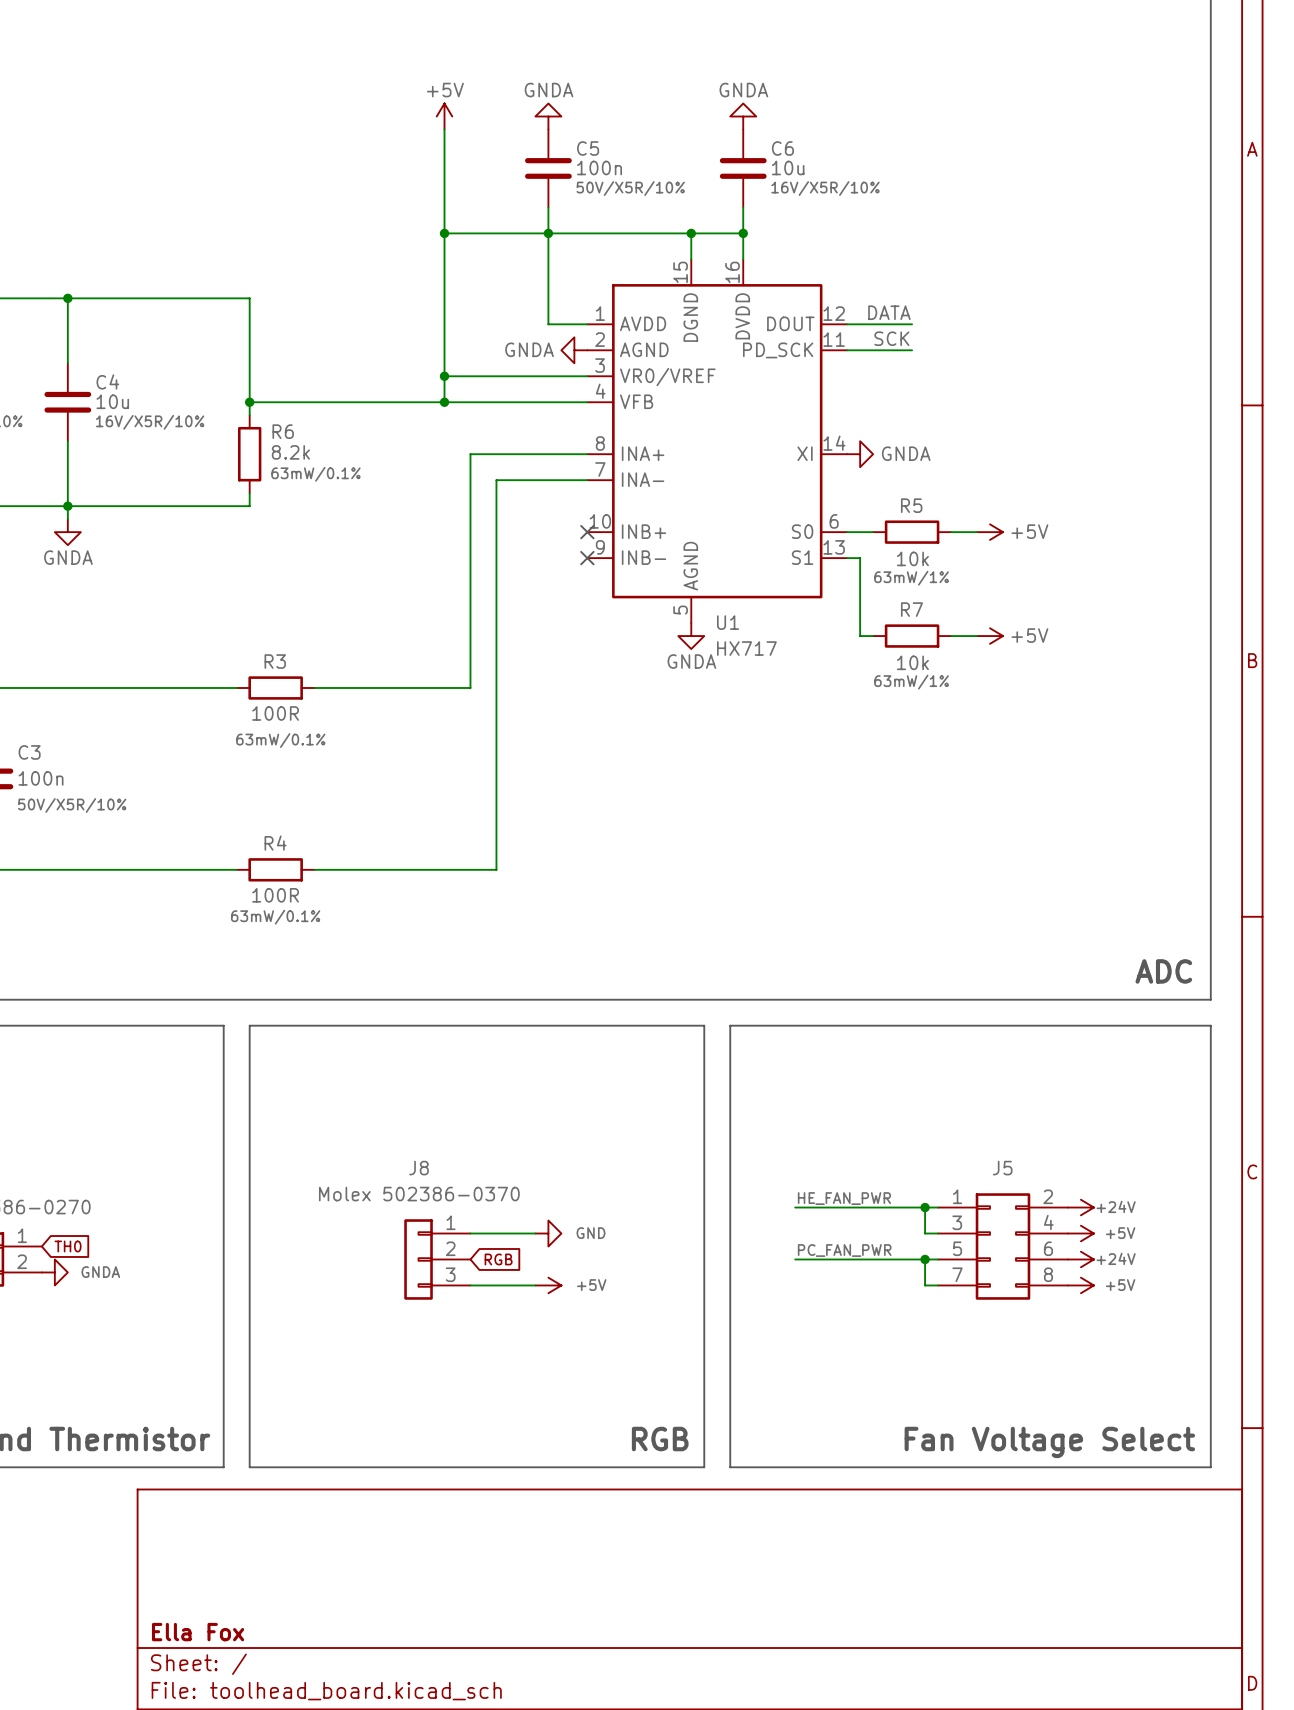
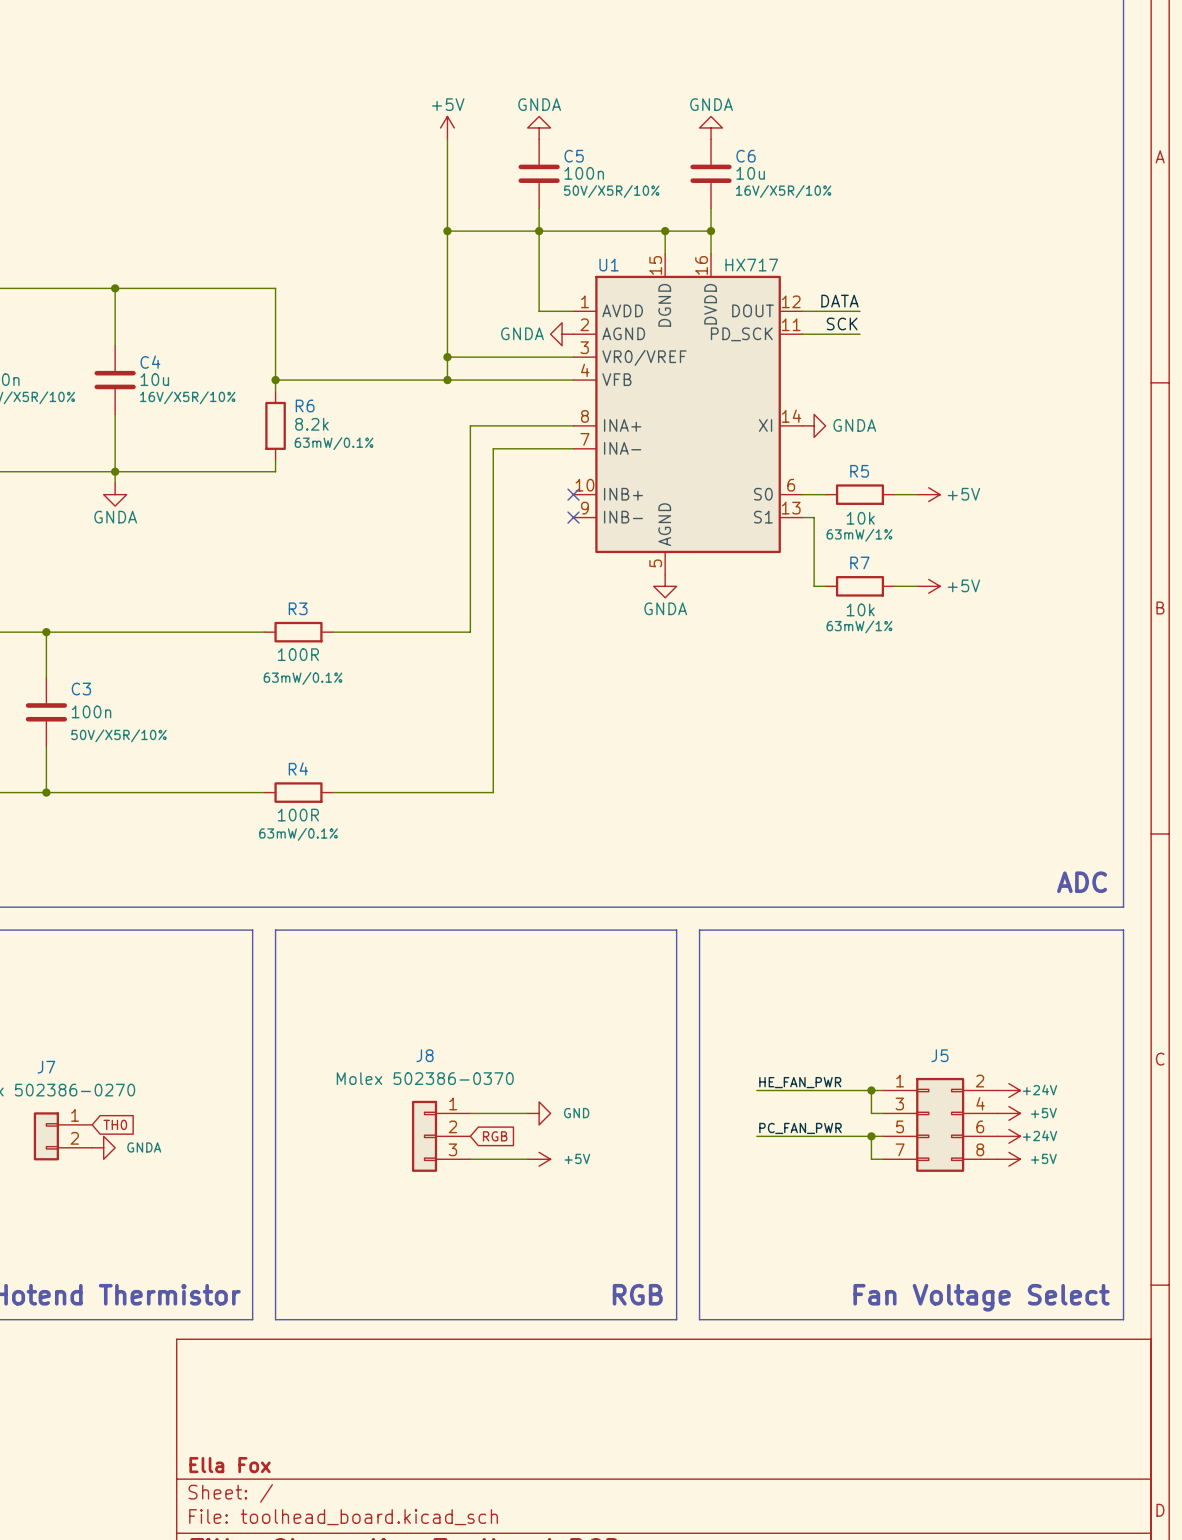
U1 name position: U1 (728, 622) -> U1 (609, 265)
U1 value position: HX717 (746, 648) -> HX717 (751, 265)

